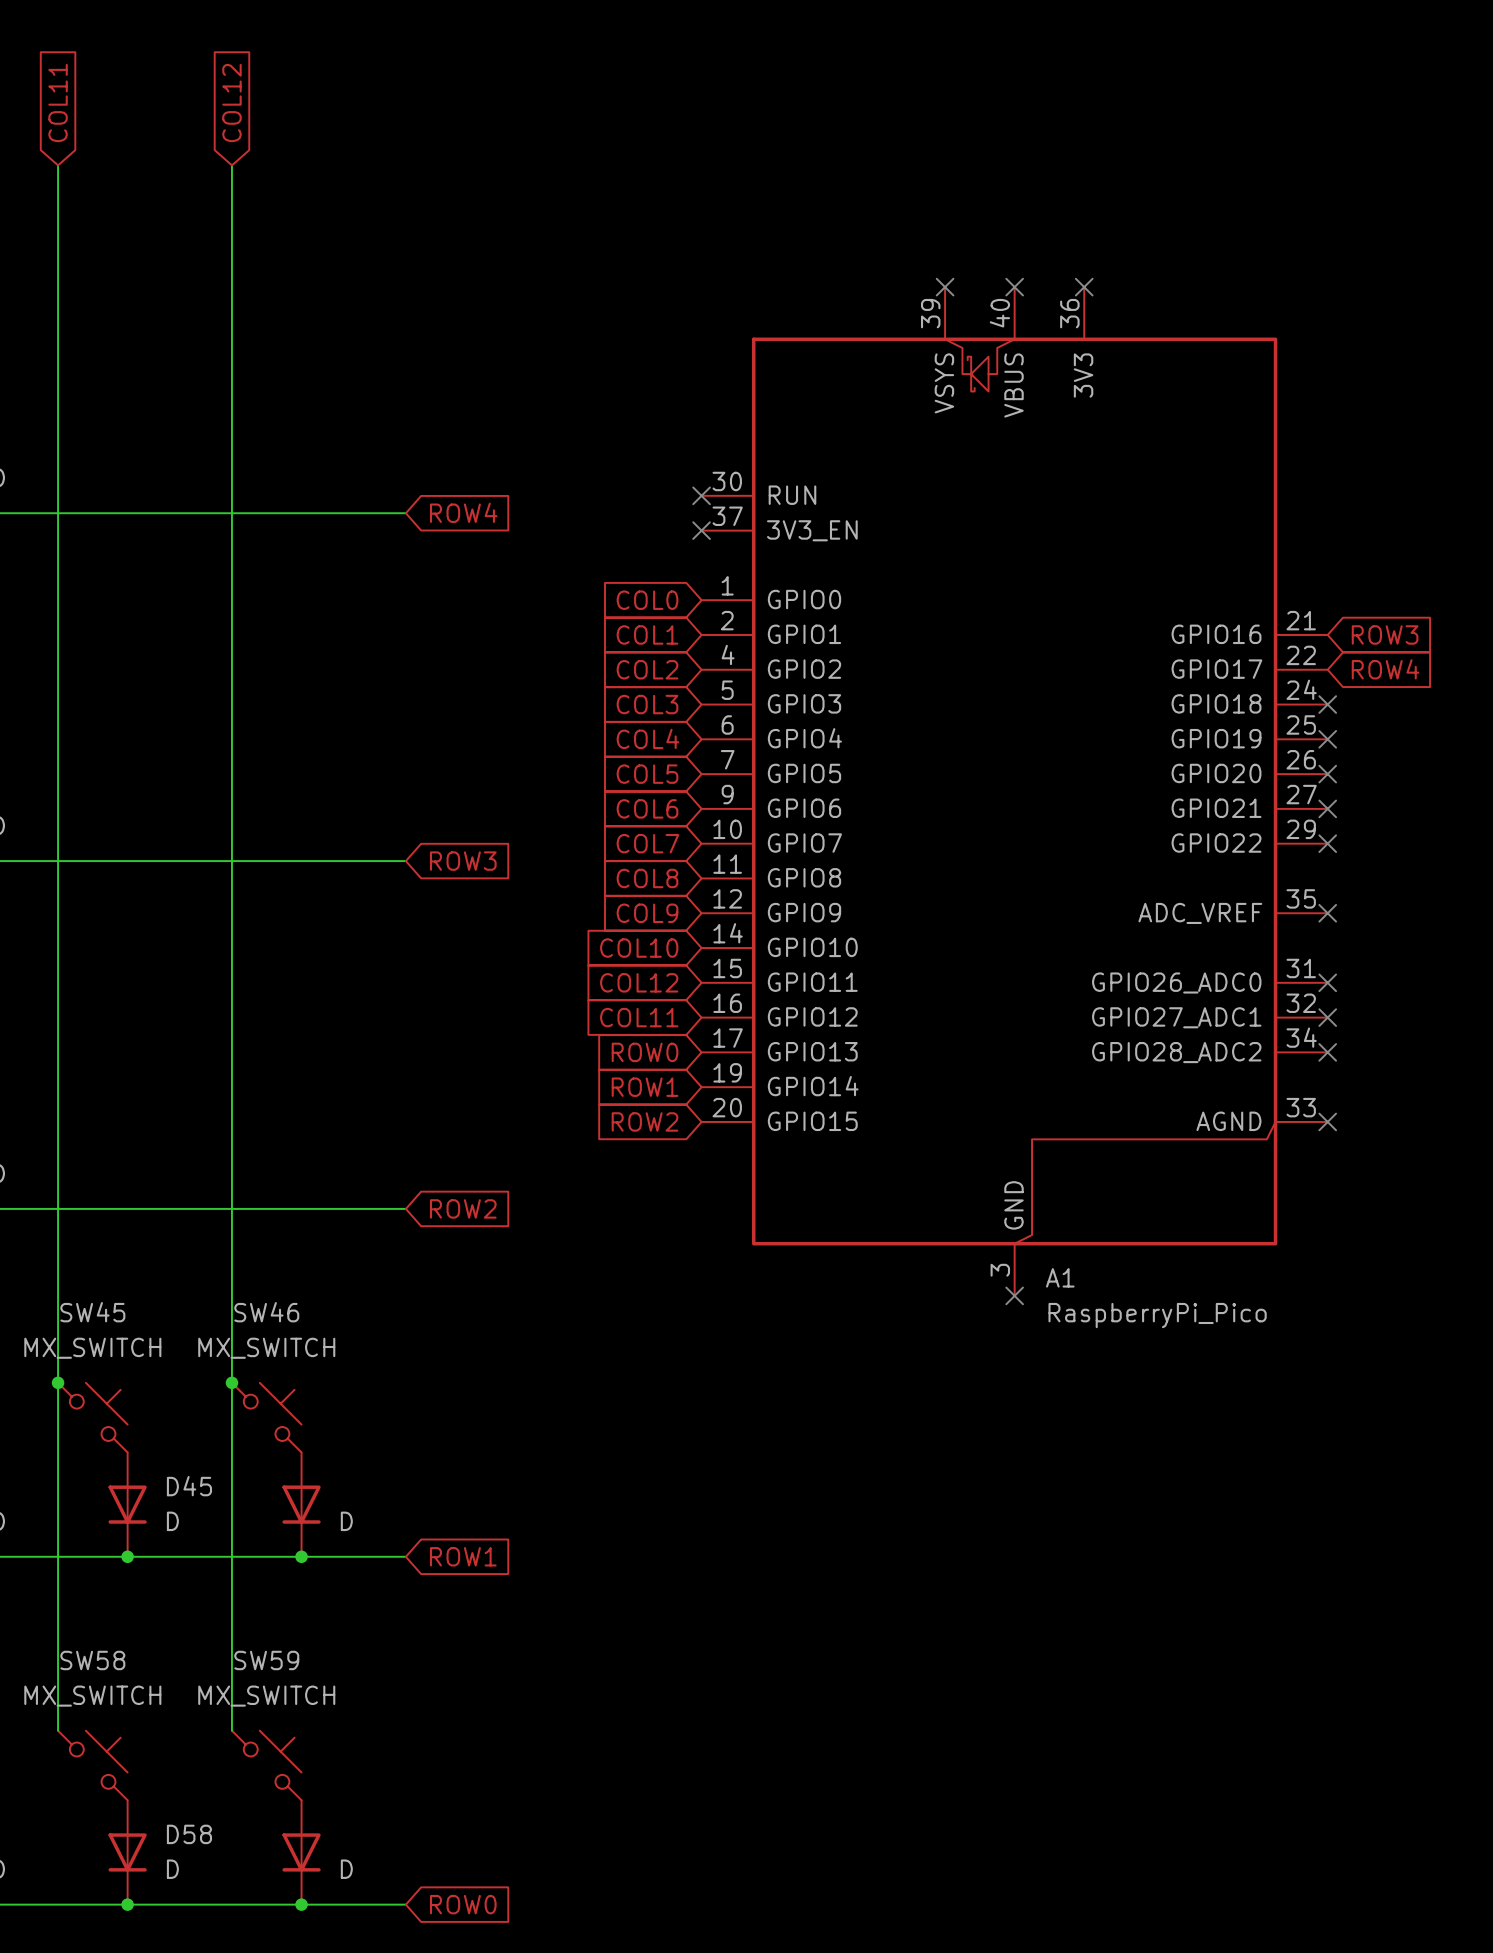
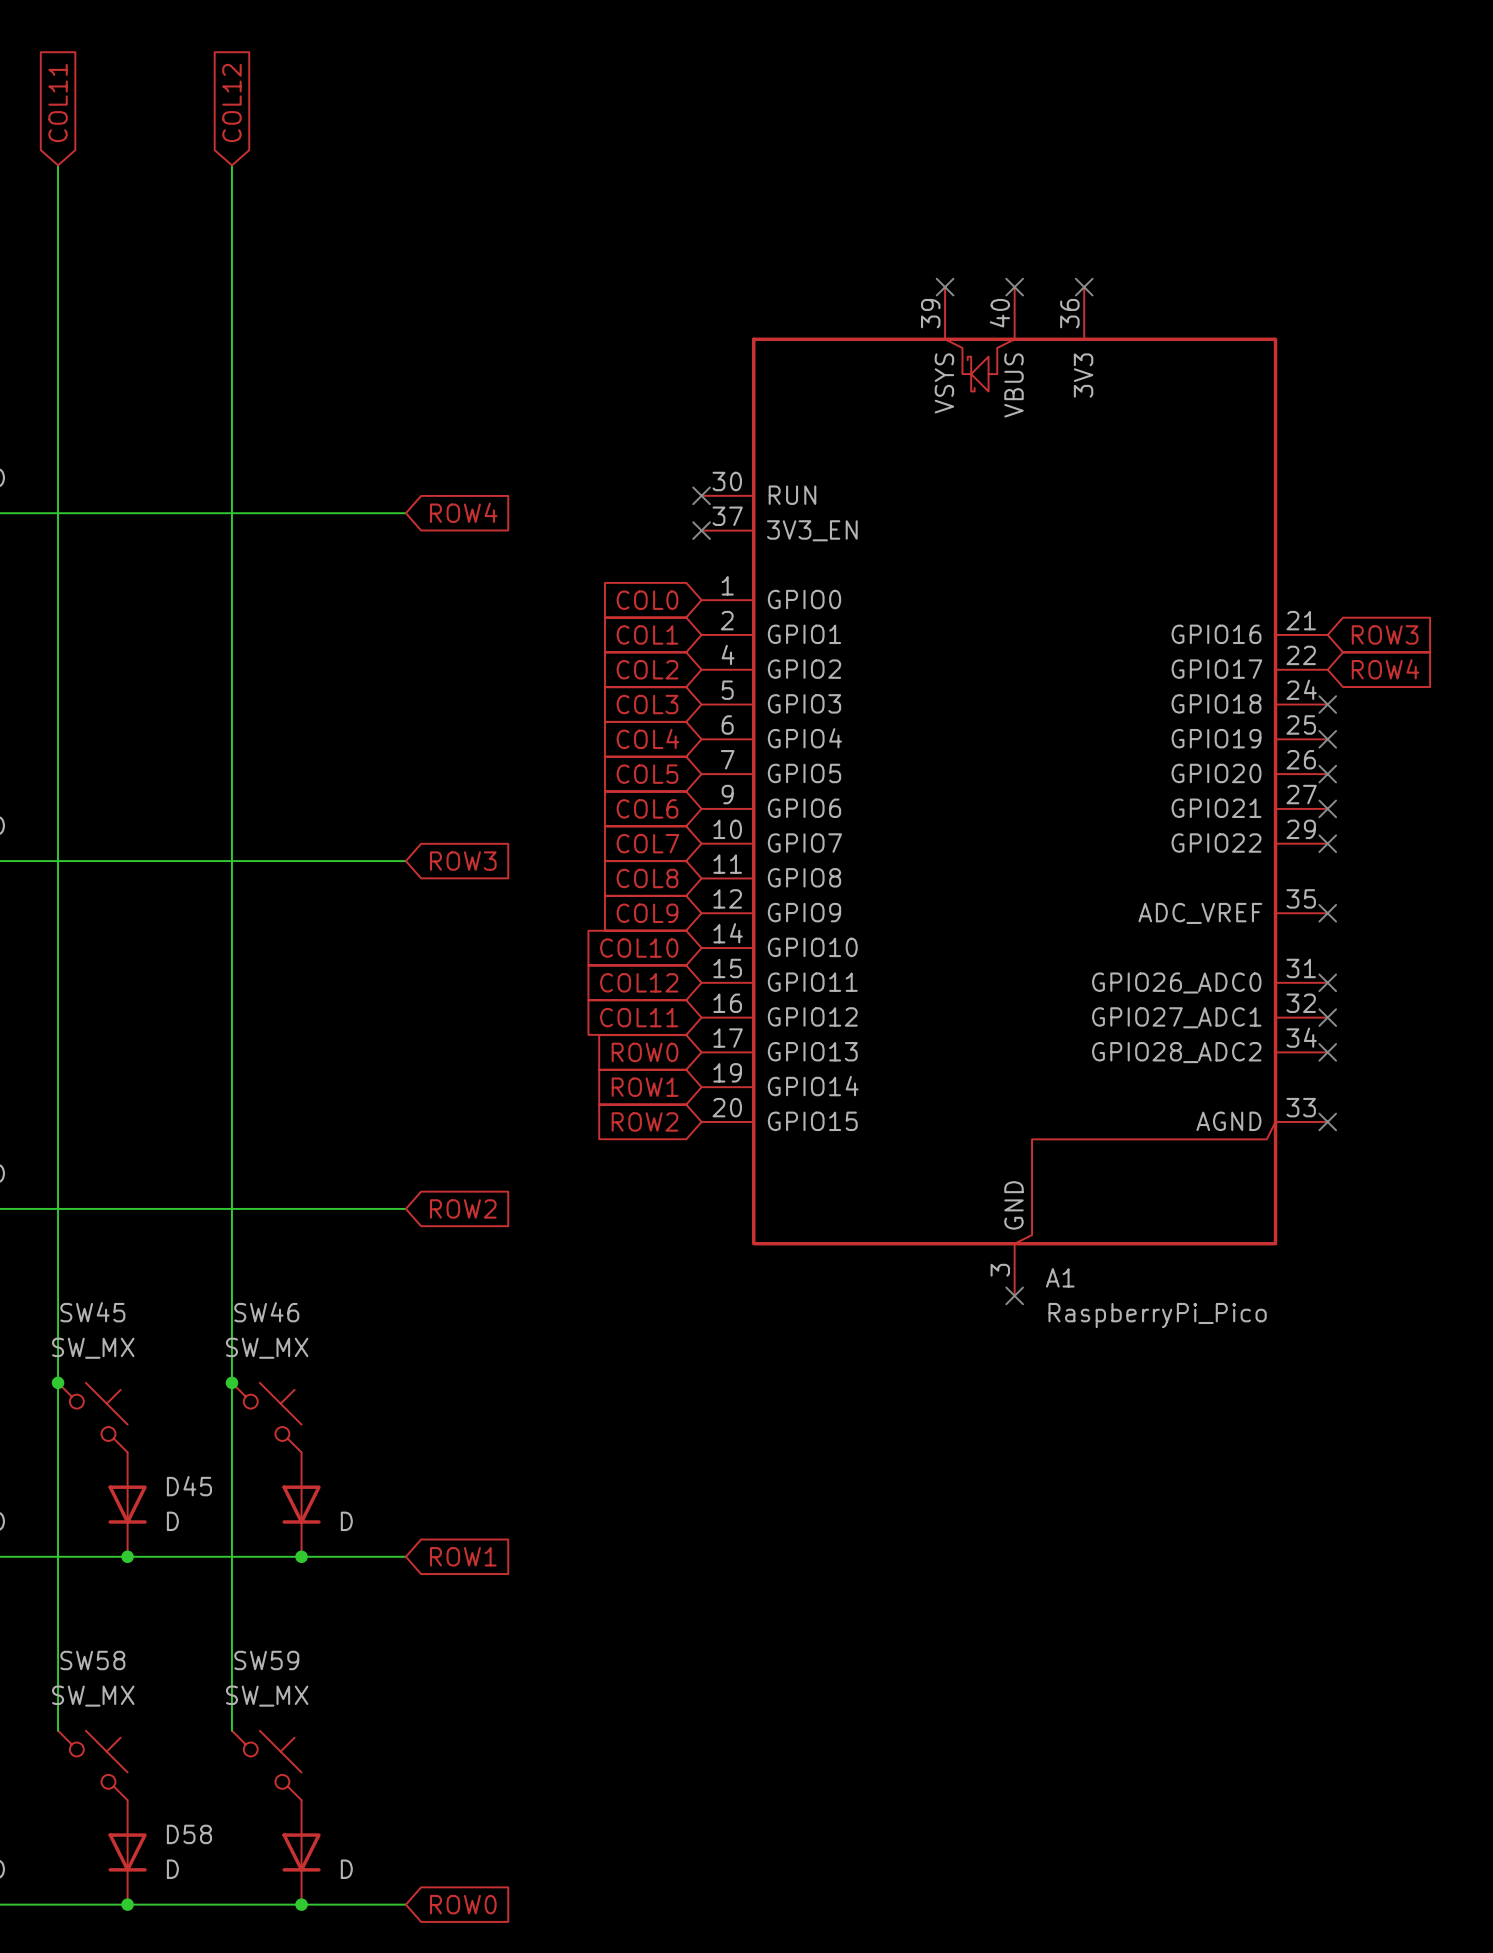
SW45 value: MX_SWITCH (92, 1348) -> SW_MX (93, 1348)
SW46 value: MX_SWITCH (266, 1348) -> SW_MX (267, 1348)
SW58 value: MX_SWITCH (92, 1696) -> SW_MX (93, 1696)
SW59 value: MX_SWITCH (266, 1696) -> SW_MX (267, 1696)

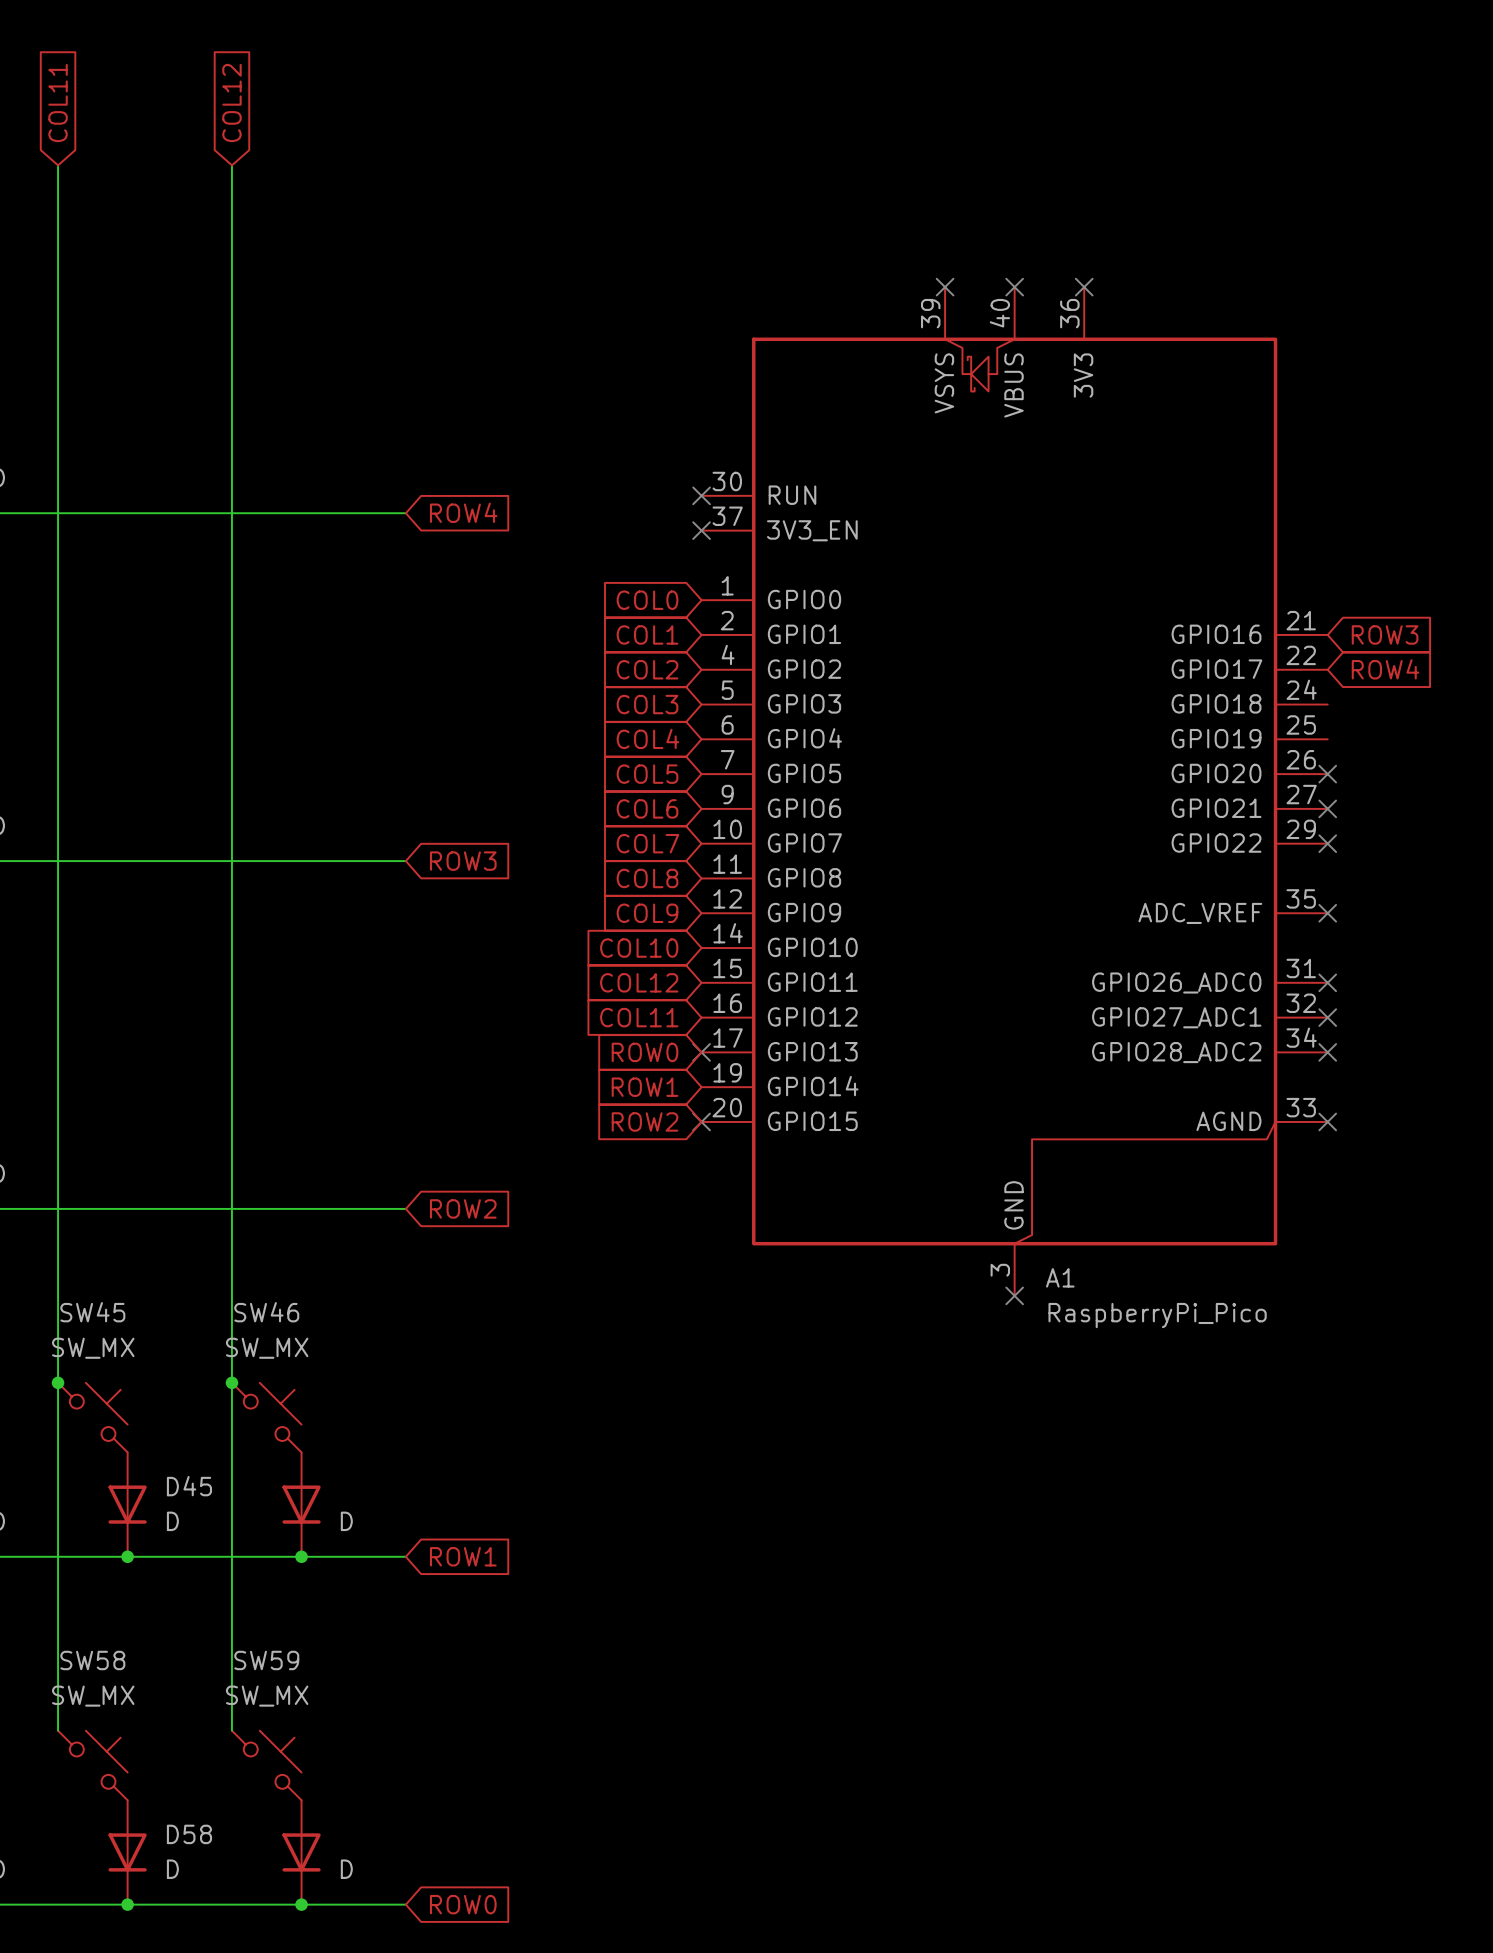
no-connect mark: (1327, 704) -> none
no-connect mark: (1327, 739) -> none
no-connect mark: none -> (701, 1052)
no-connect mark: none -> (701, 1121)

